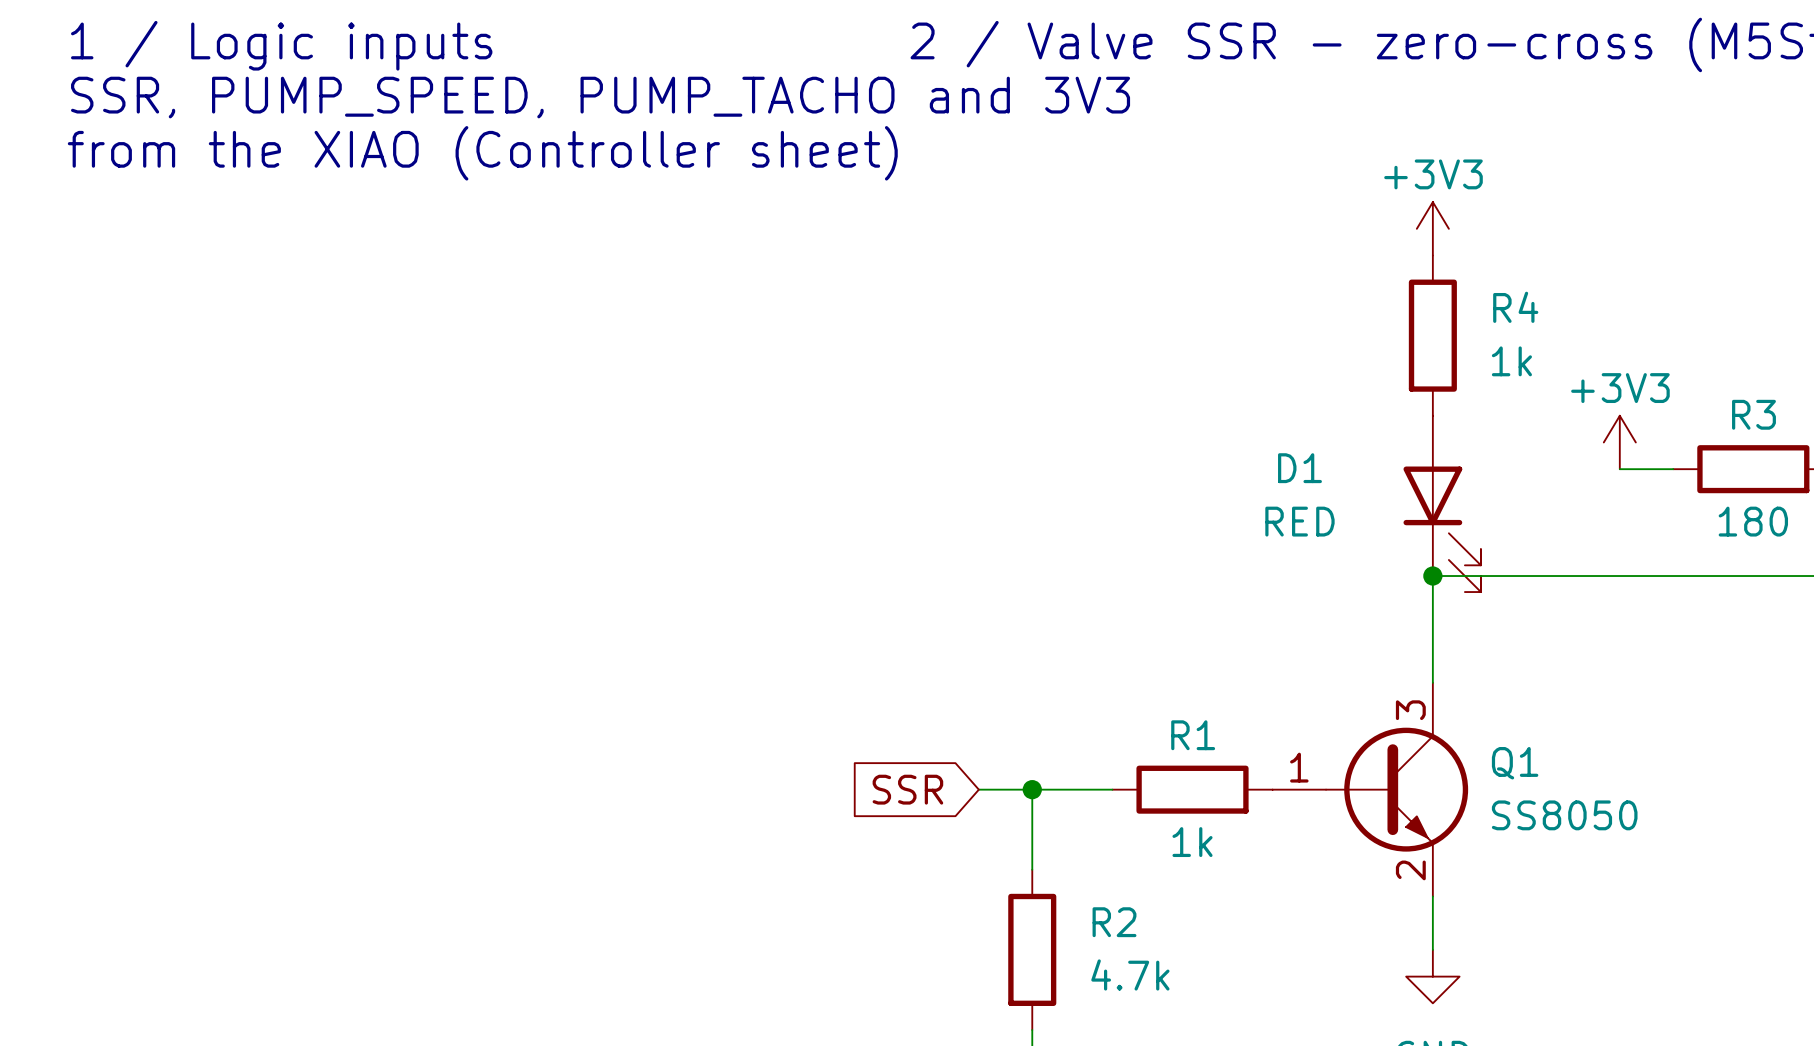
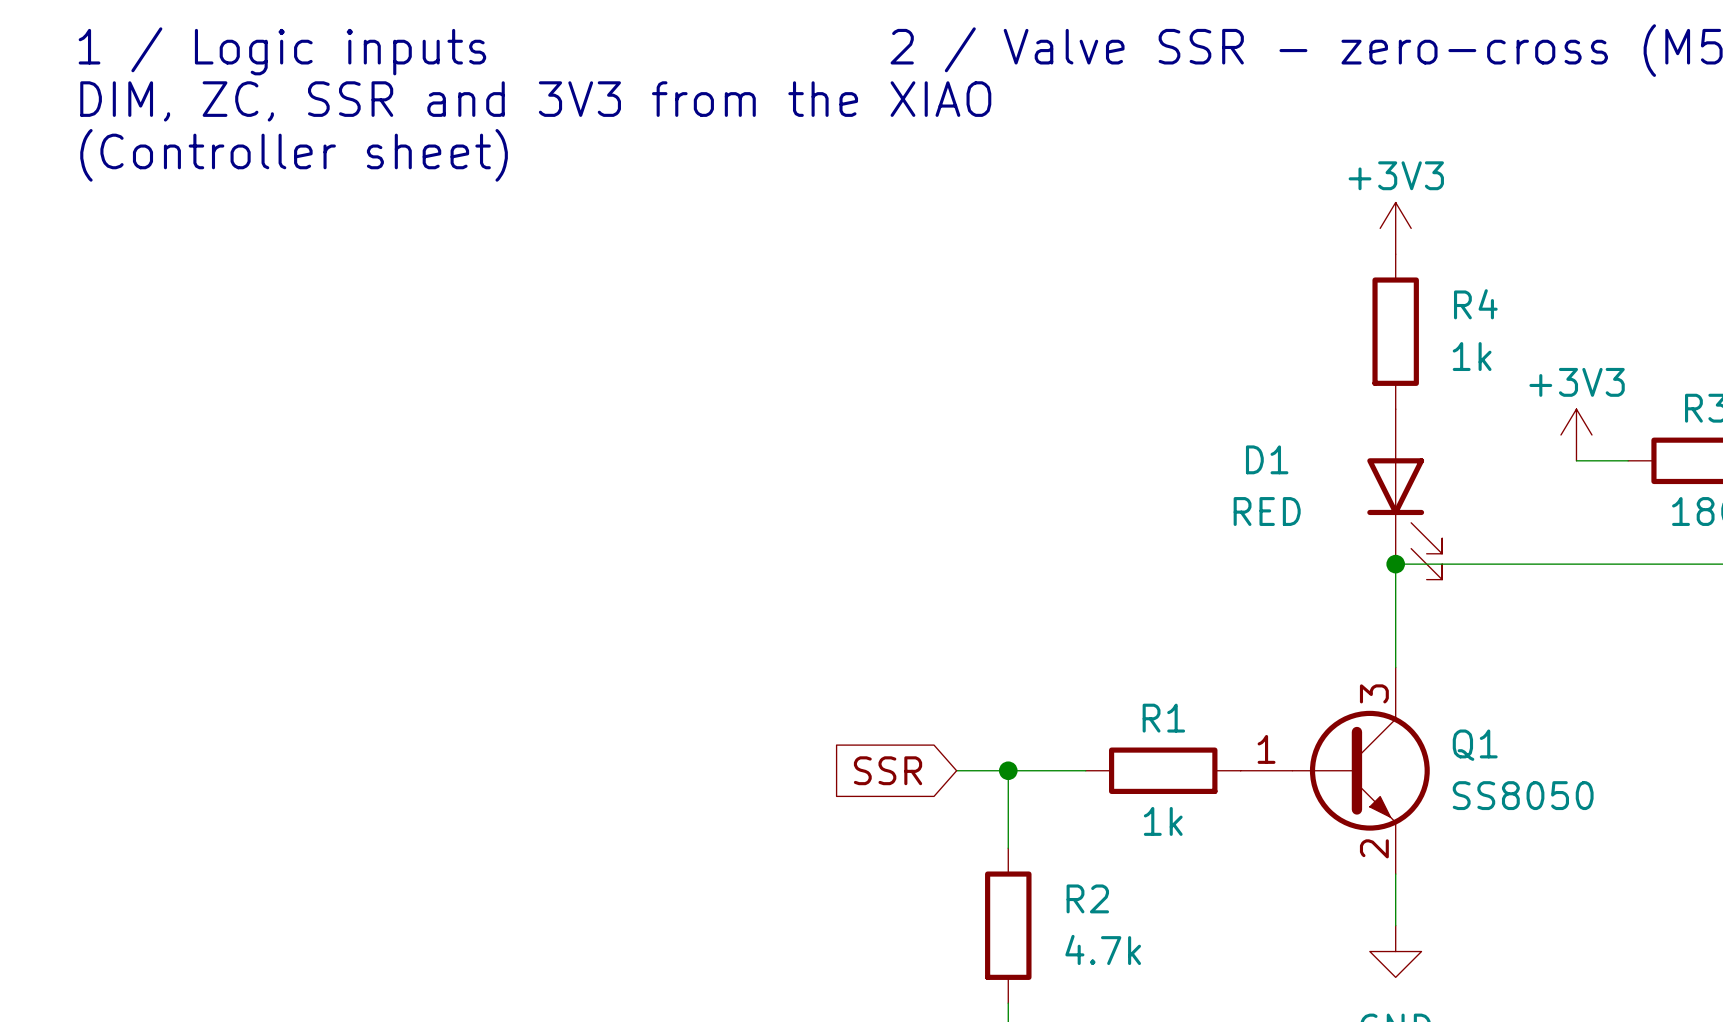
text: SSR, PUMP_SPEED, PUMP_TACHO and 3V3 (600, 97) -> DIM, ZC, SSR and 3V3 from the XIAO (535, 101)
text: from the XIAO (Controller sheet) (482, 153) -> (Controller sheet) (294, 155)

